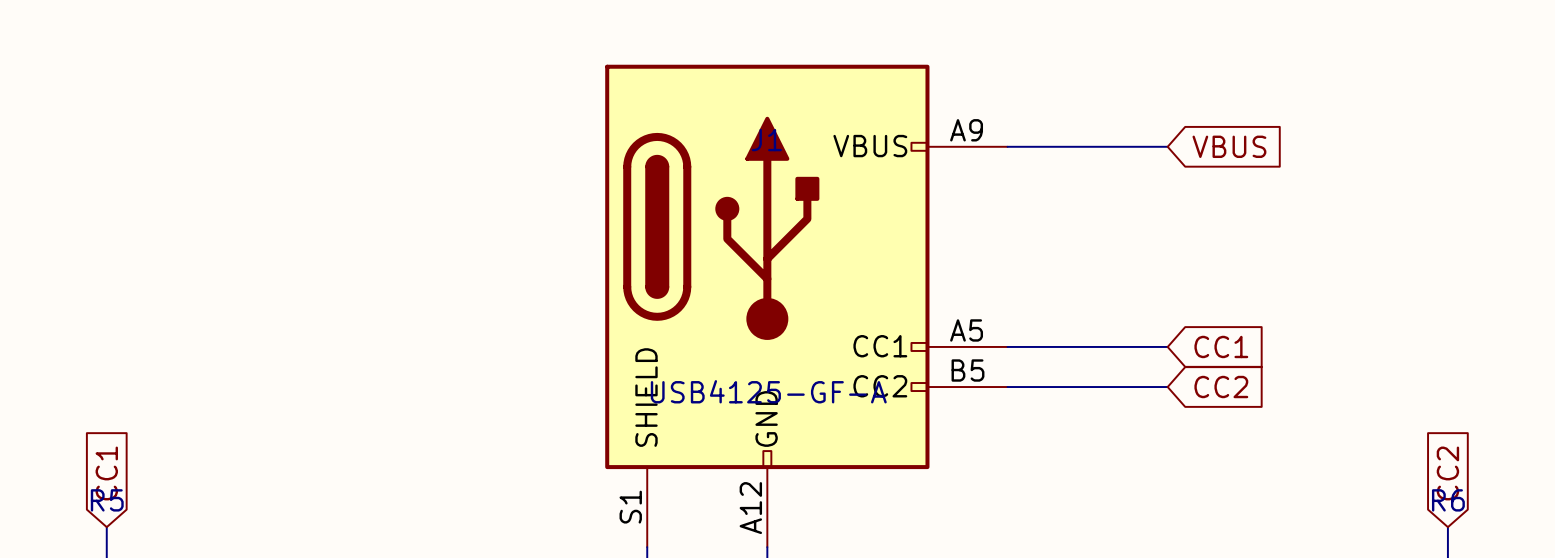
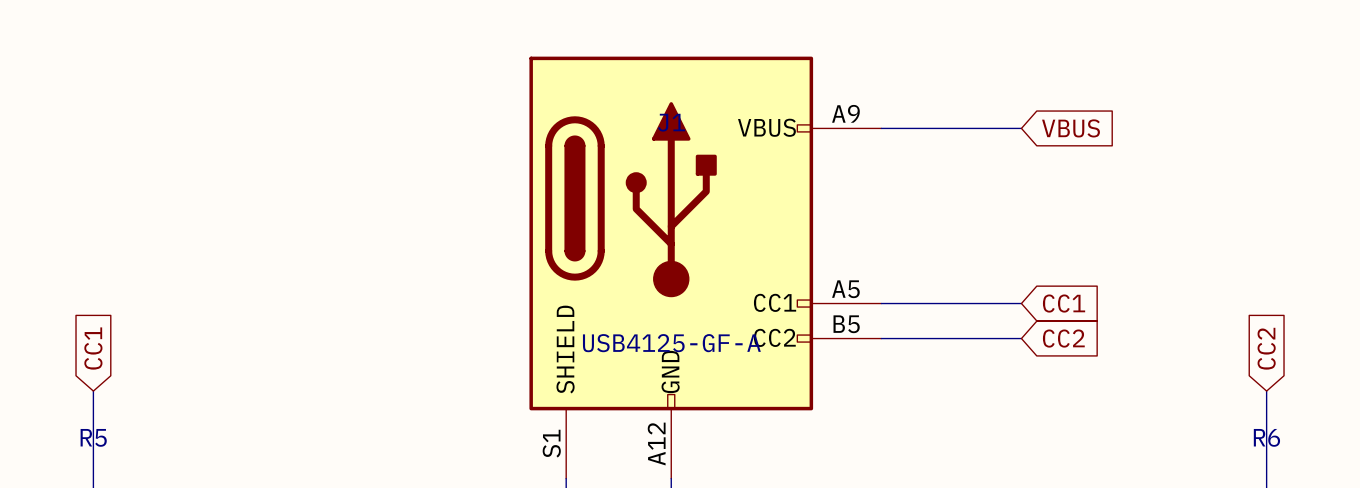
wire: none -> (93, 391) (93, 461)
wire: none -> (1266, 391) (1266, 461)
global label position: CC1 (106, 473) -> CC1 (93, 348)
global label position: CC2 (1447, 473) -> CC2 (1266, 348)

